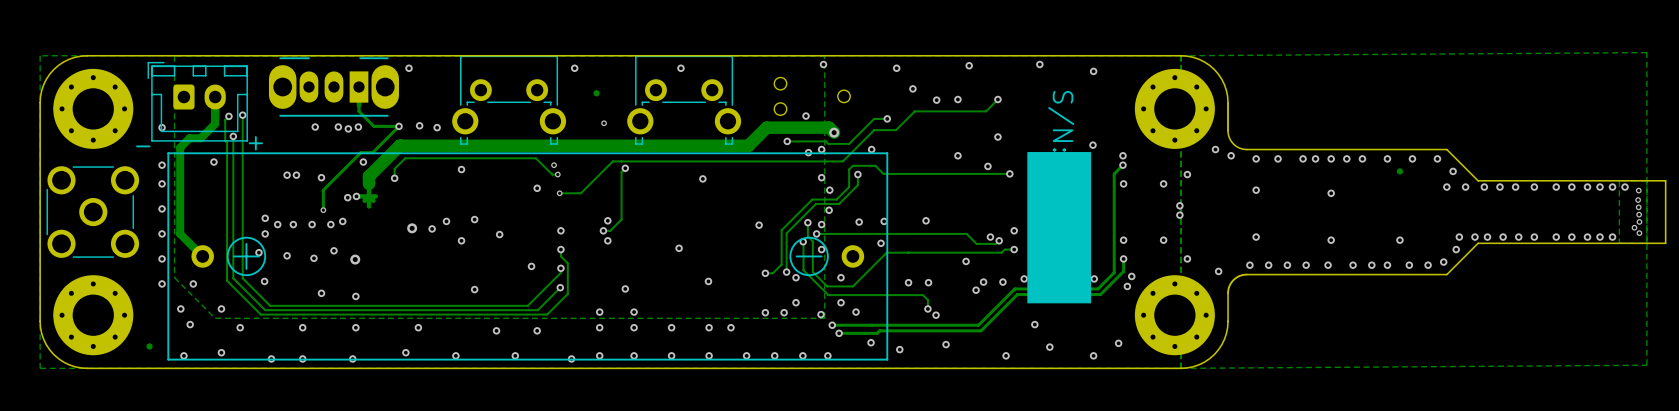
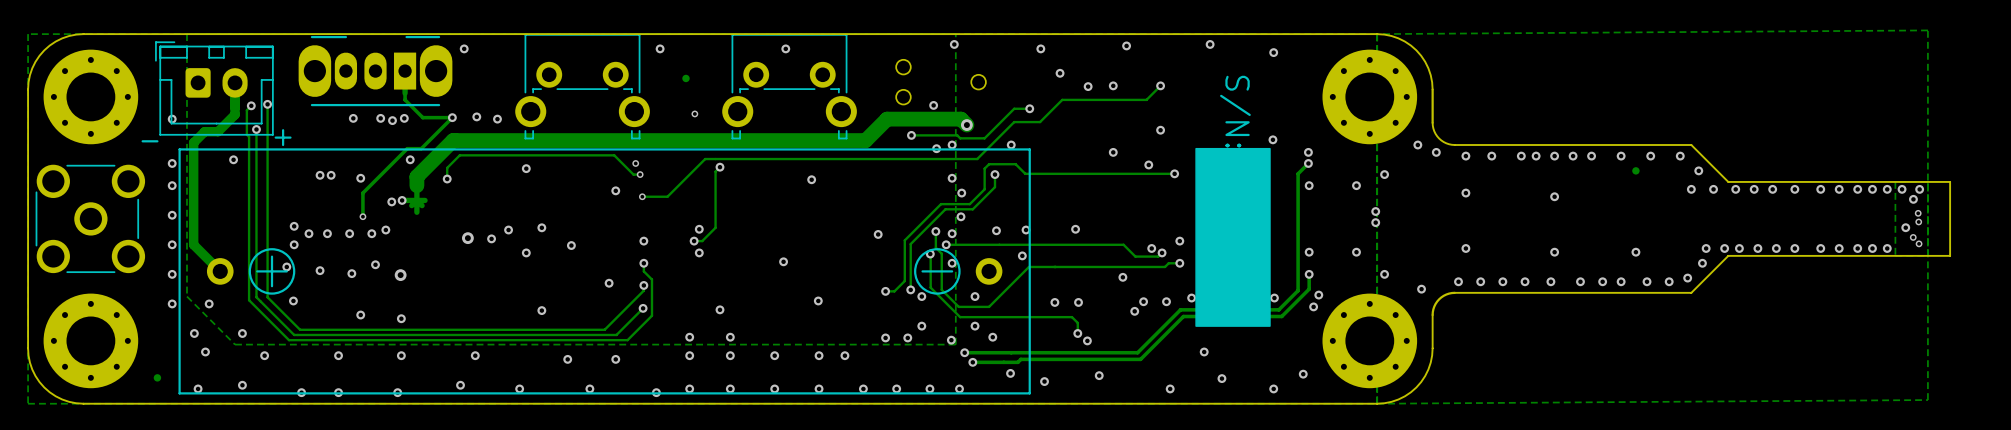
via: none -> (1919, 189)
via: (1638, 190) -> none
via: none -> (1913, 199)
via: (1638, 200) -> none
via: none -> (1905, 227)
via: (1639, 221) -> none

